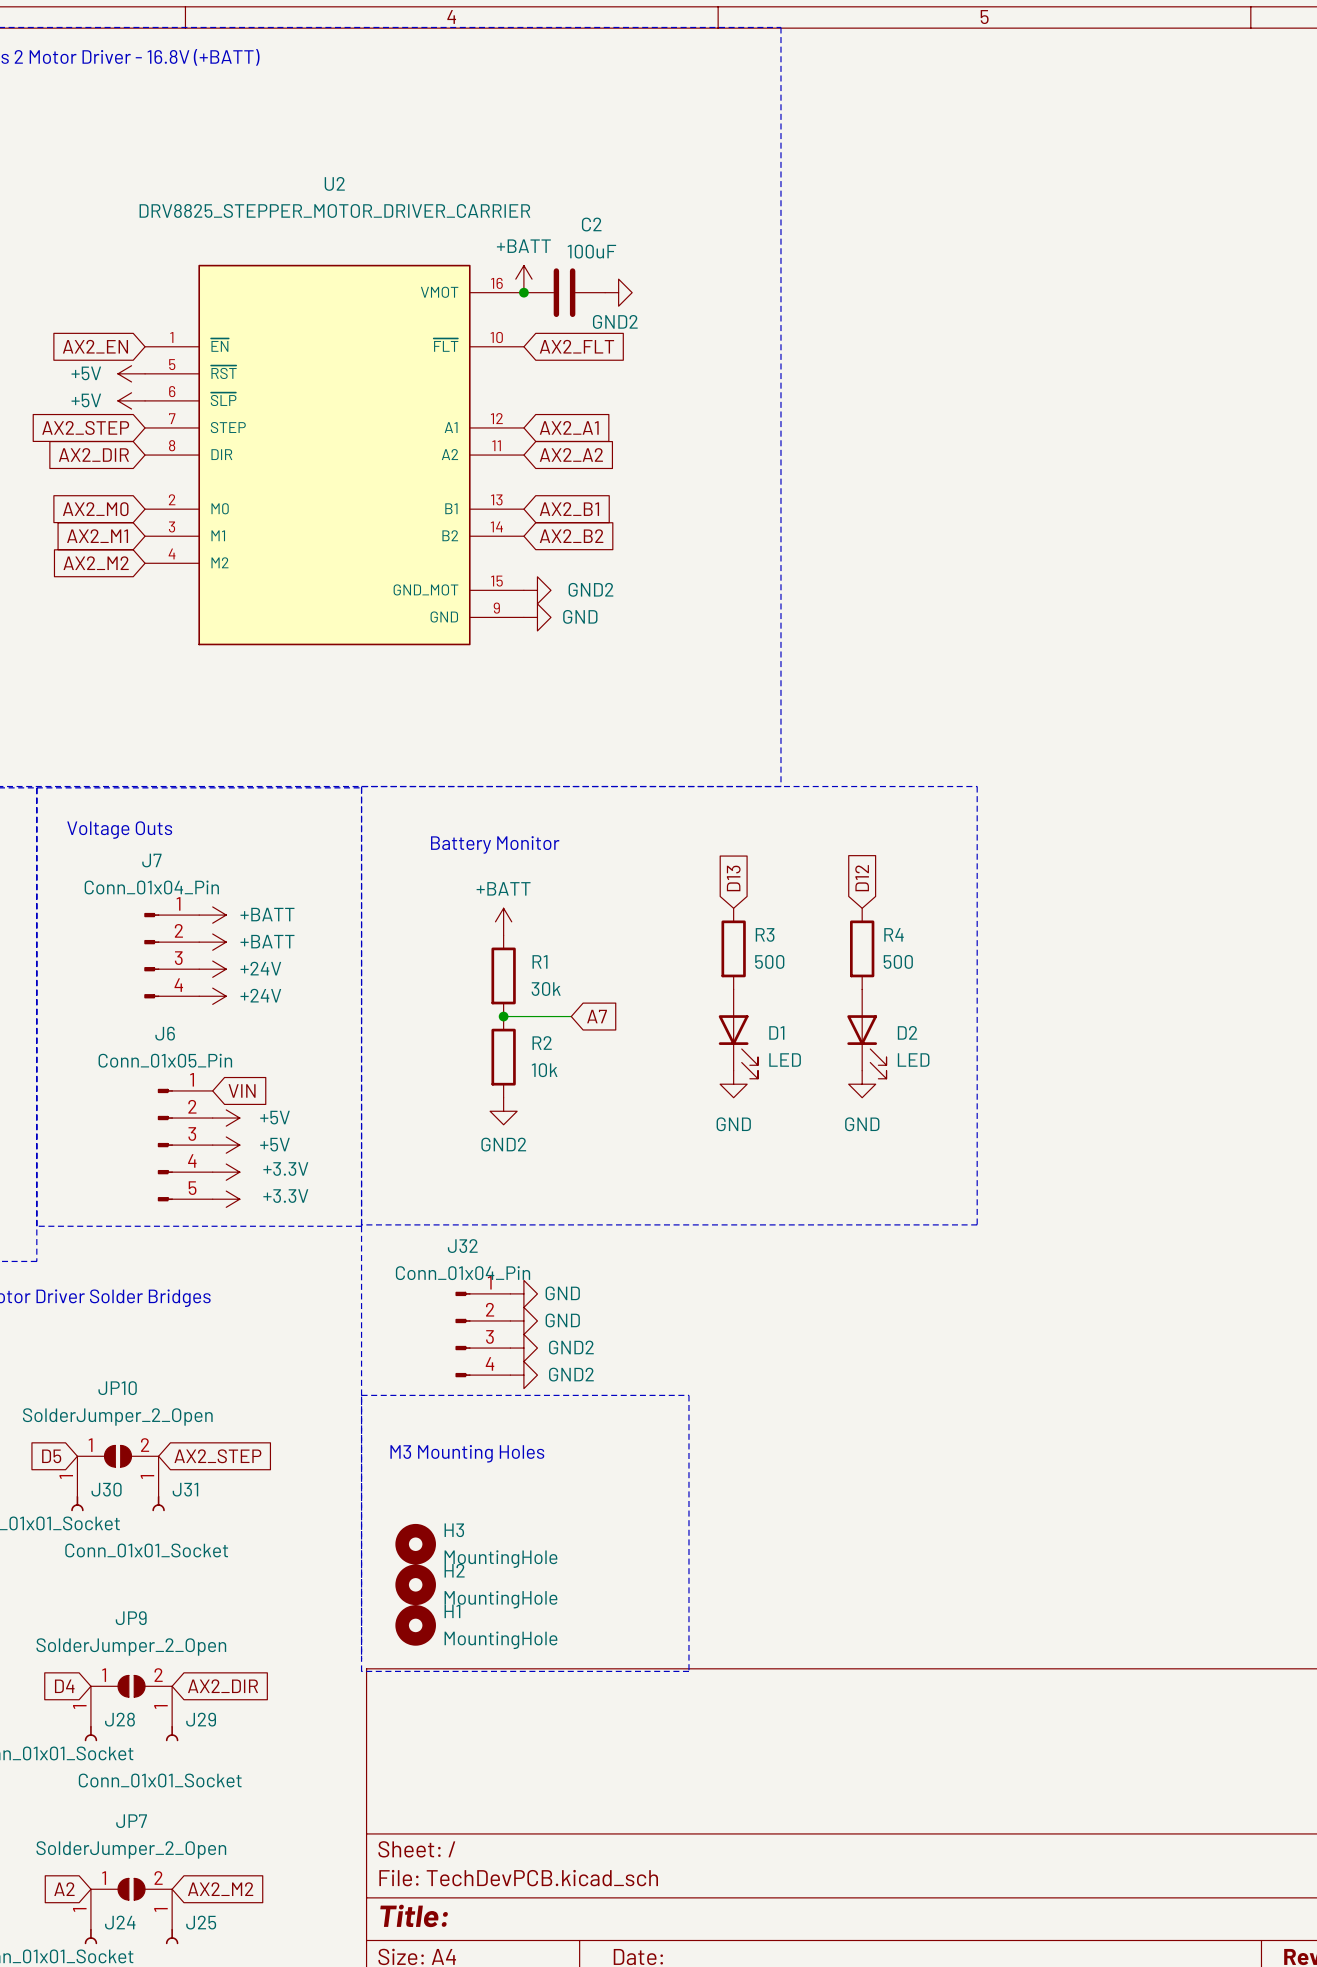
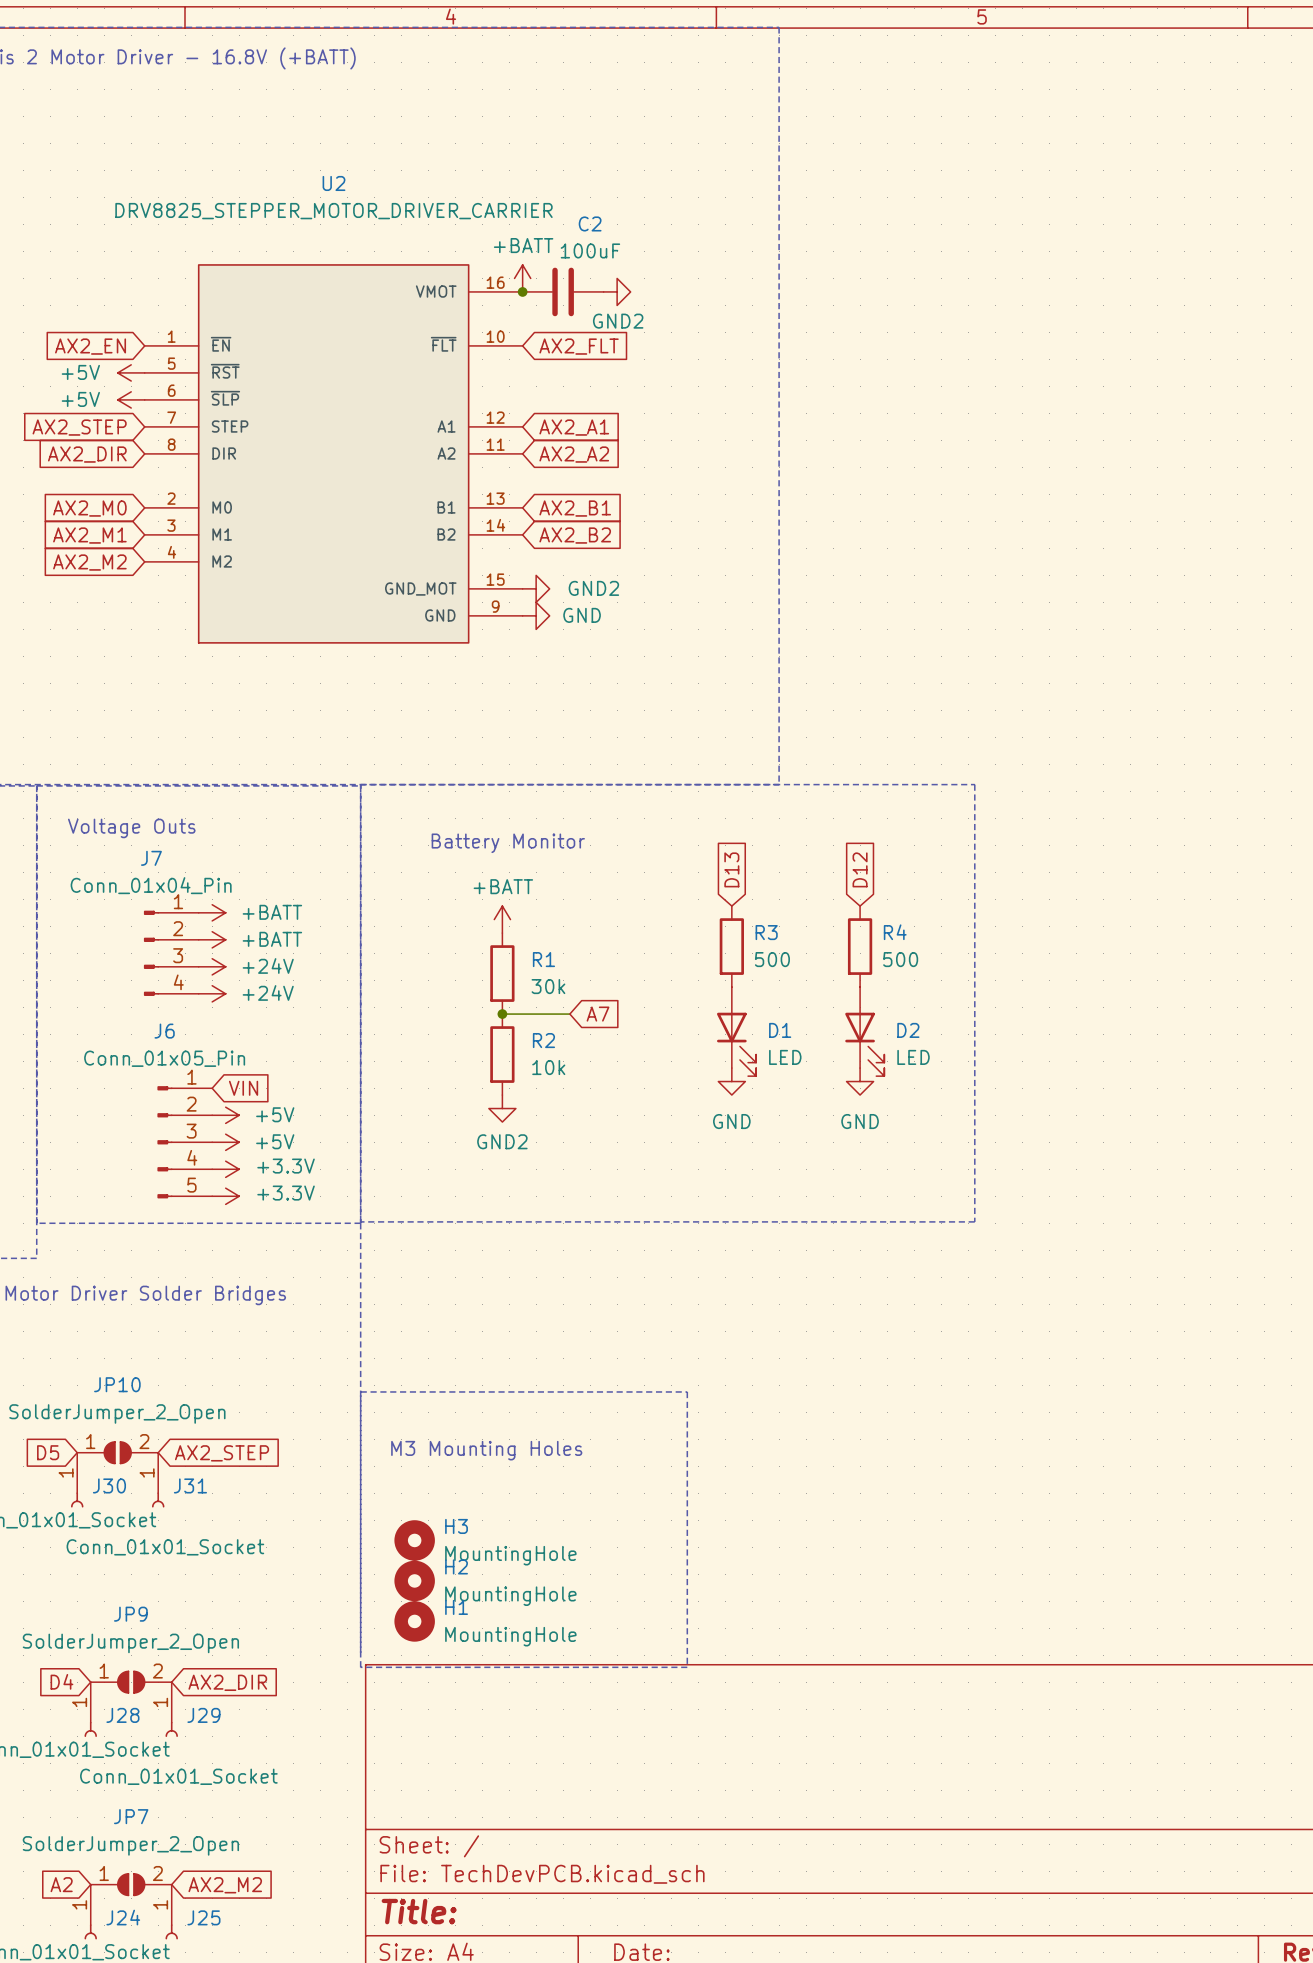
power symbol: GND (523, 1293) -> none
power symbol: GND (523, 1320) -> none
J32: Conn_01x04_Pin (482, 1334) -> none
power symbol: GND2 (523, 1348) -> none
power symbol: GND2 (523, 1375) -> none

